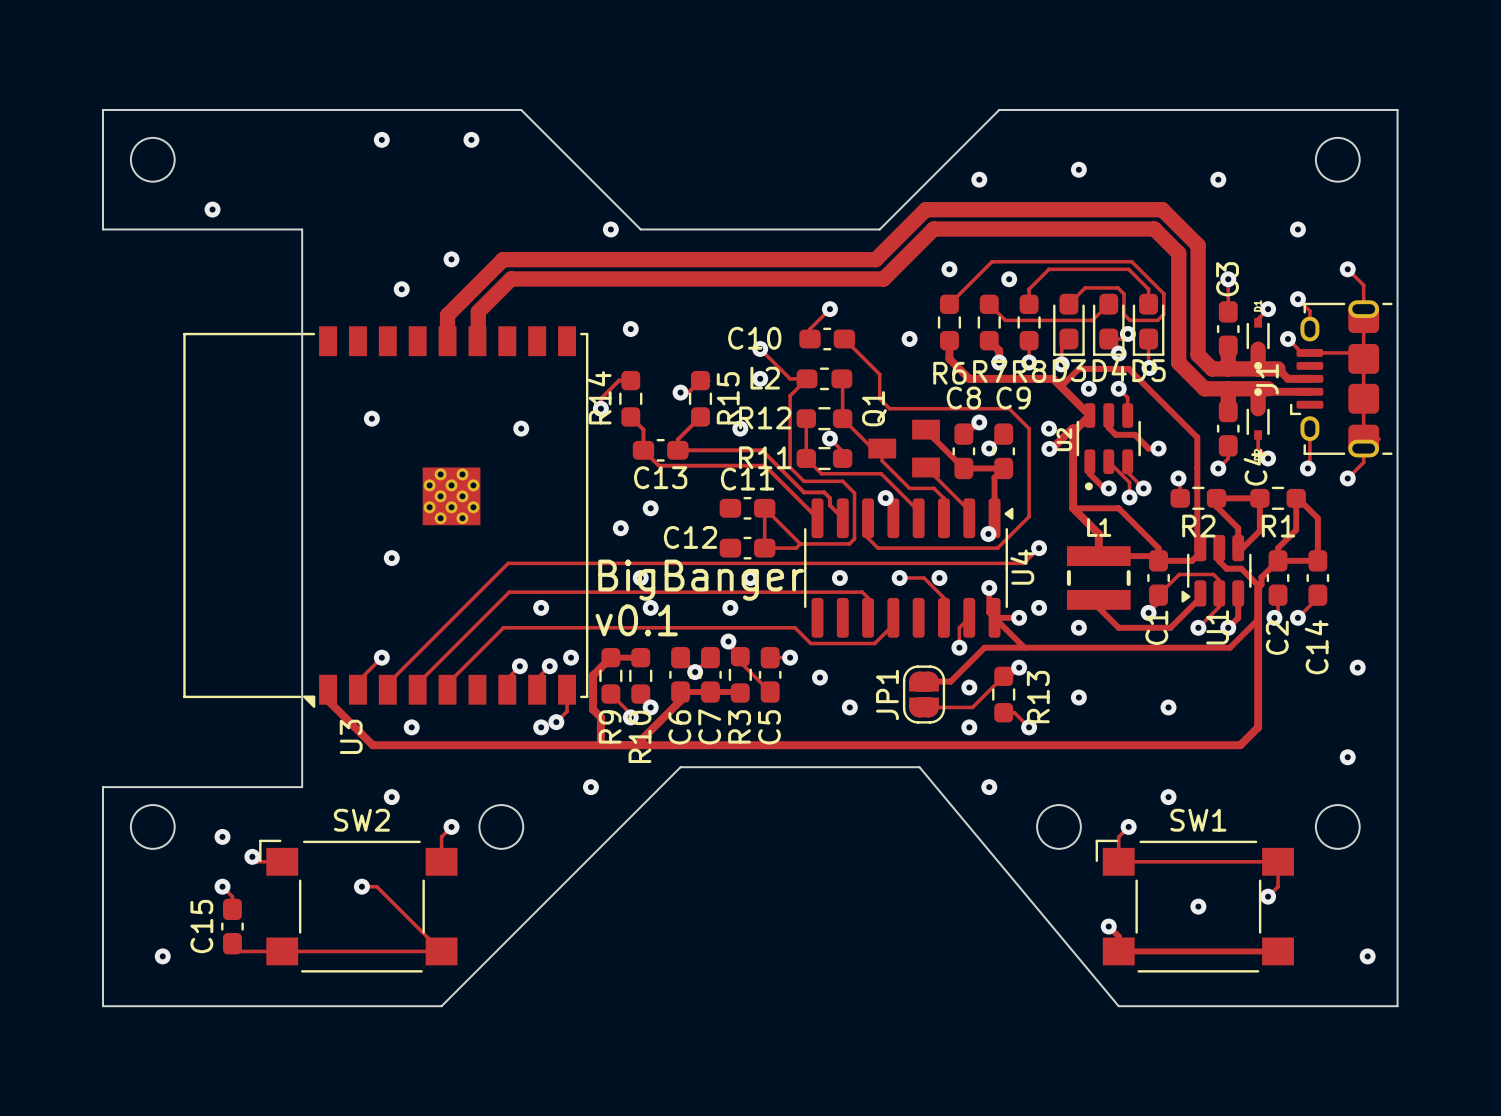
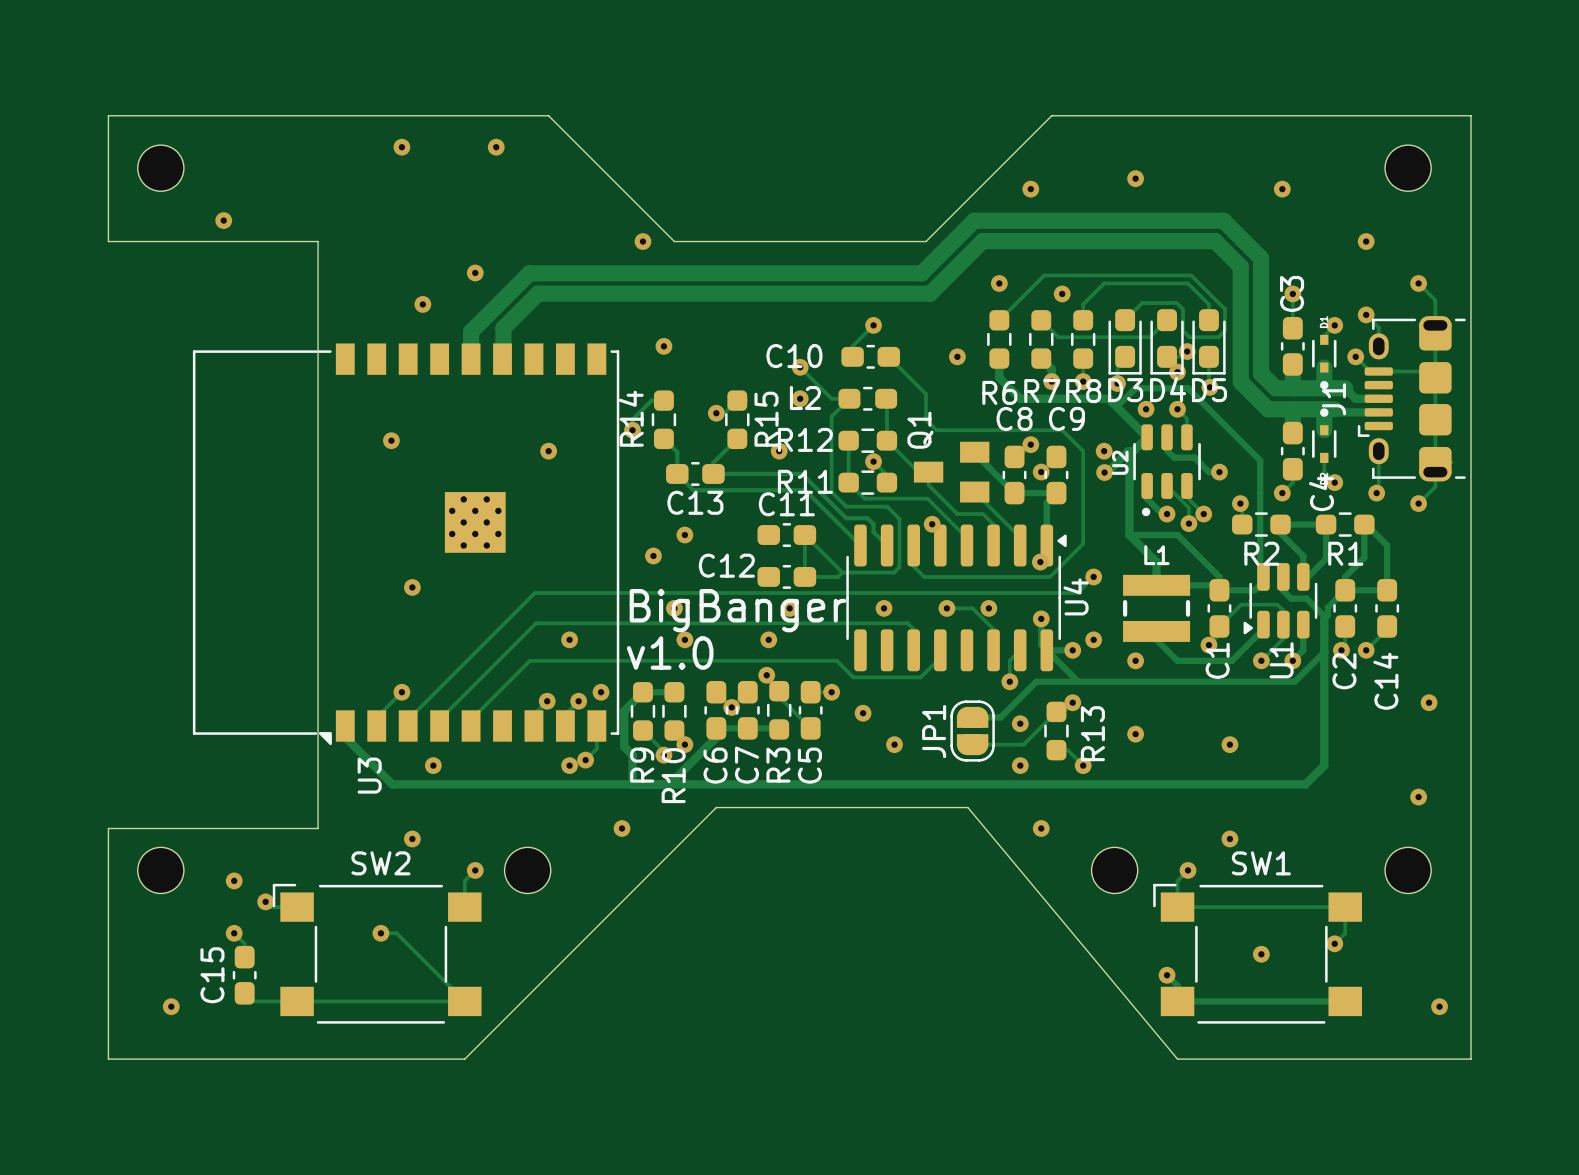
text: v0.1 (636, 620) -> v1.0 (670, 653)

